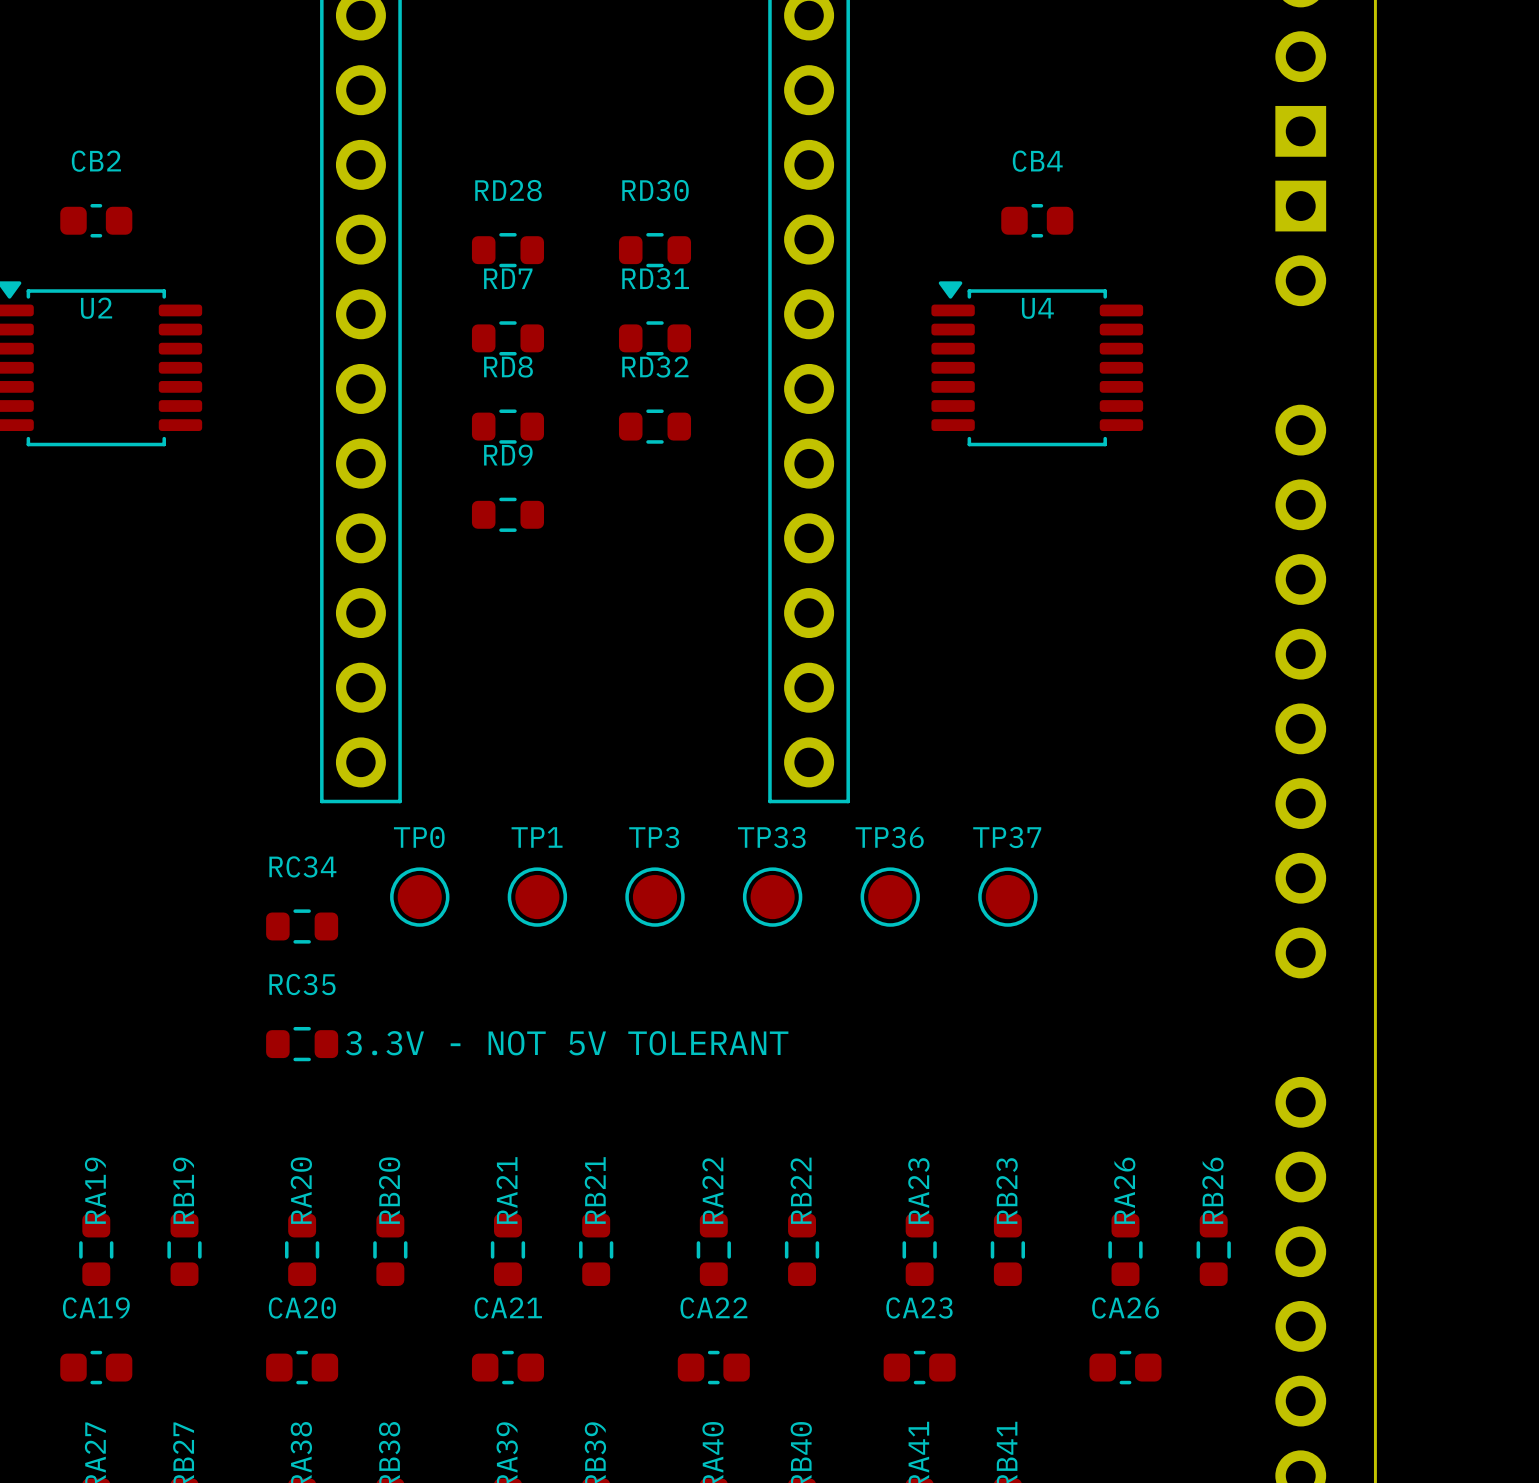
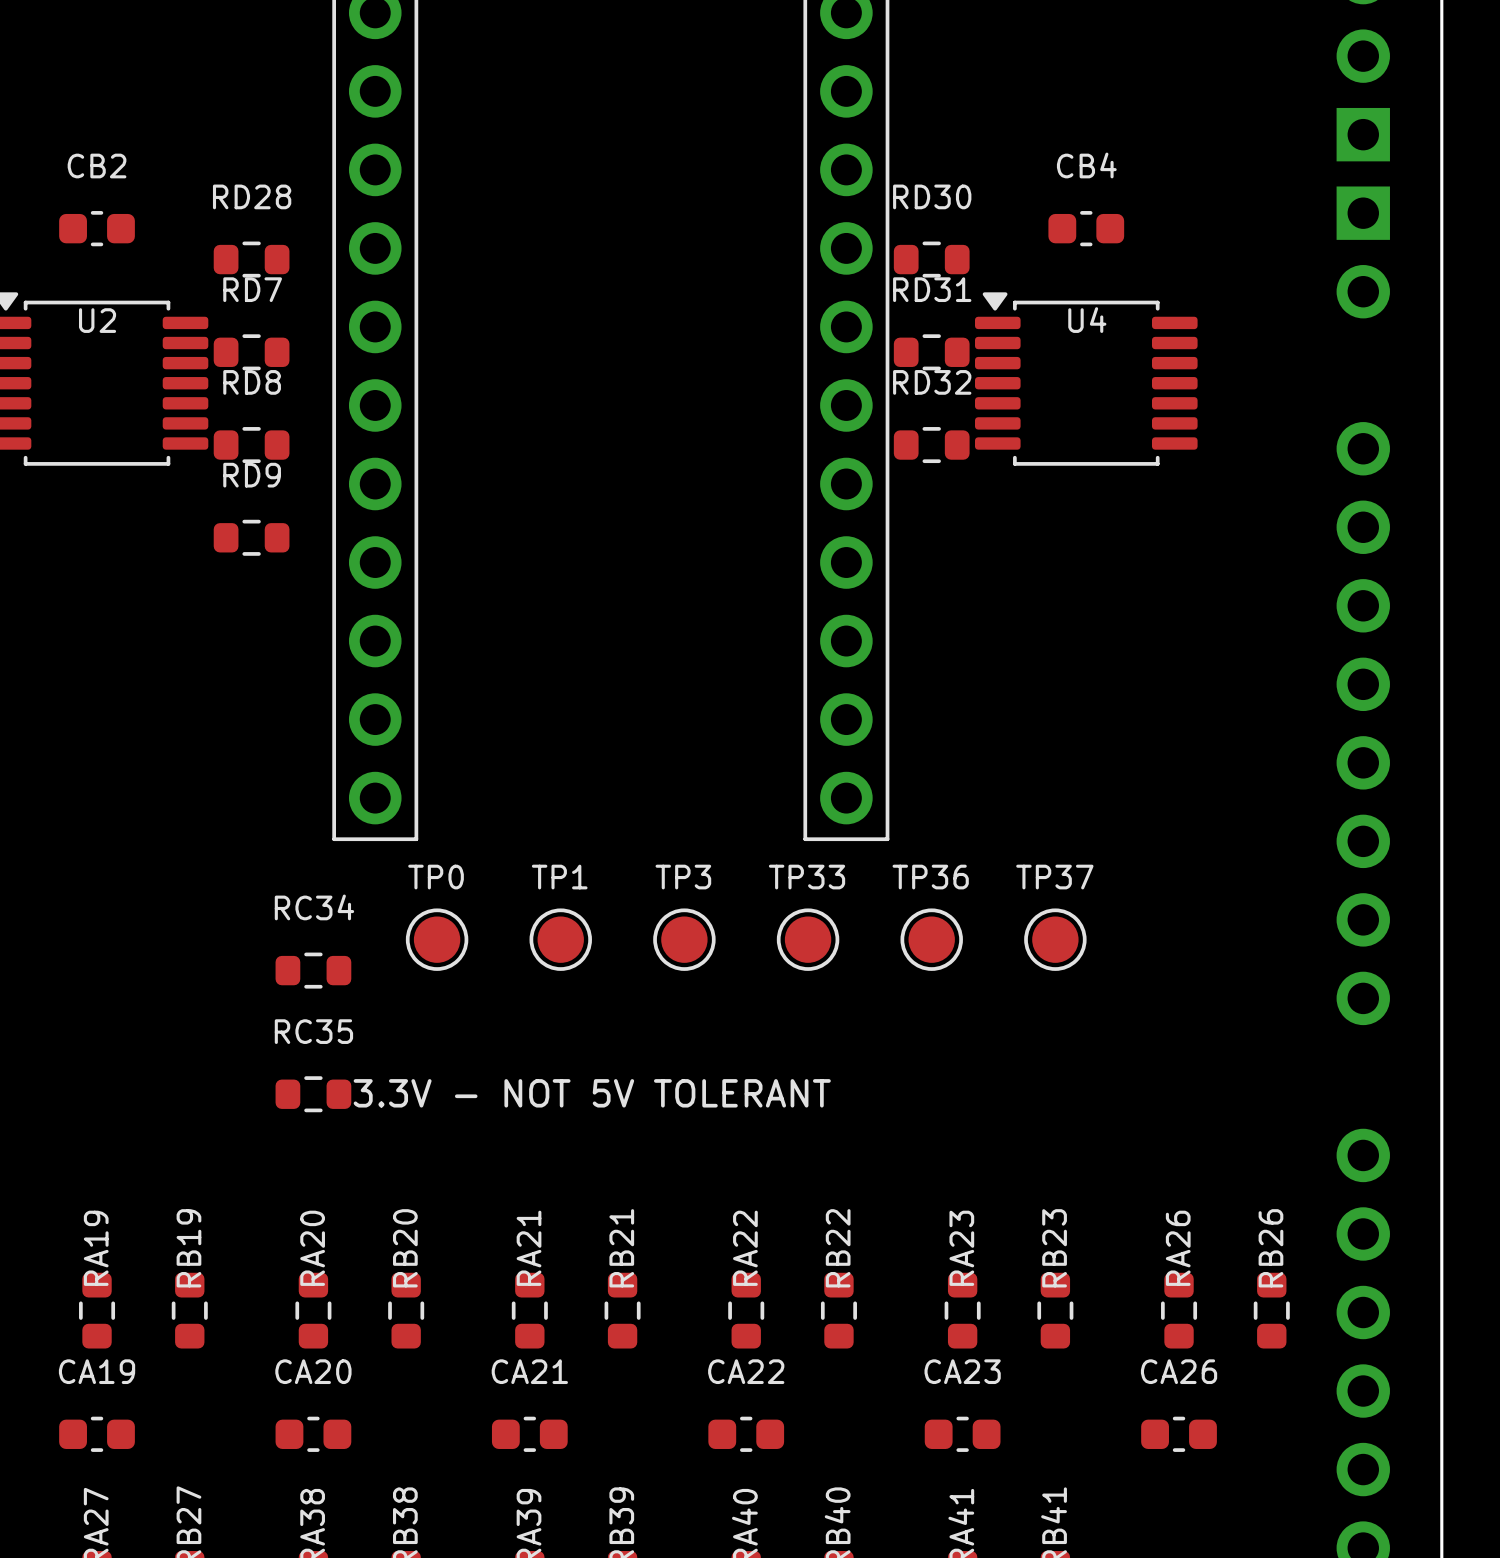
RD28 position: (507, 250) -> (251, 259)
RD30 position: (655, 250) -> (931, 259)
RD7 position: (507, 338) -> (251, 352)
RD31 position: (655, 338) -> (931, 352)
RD8 position: (507, 426) -> (251, 445)
RD32 position: (655, 426) -> (931, 445)
RD9 position: (507, 514) -> (251, 537)

